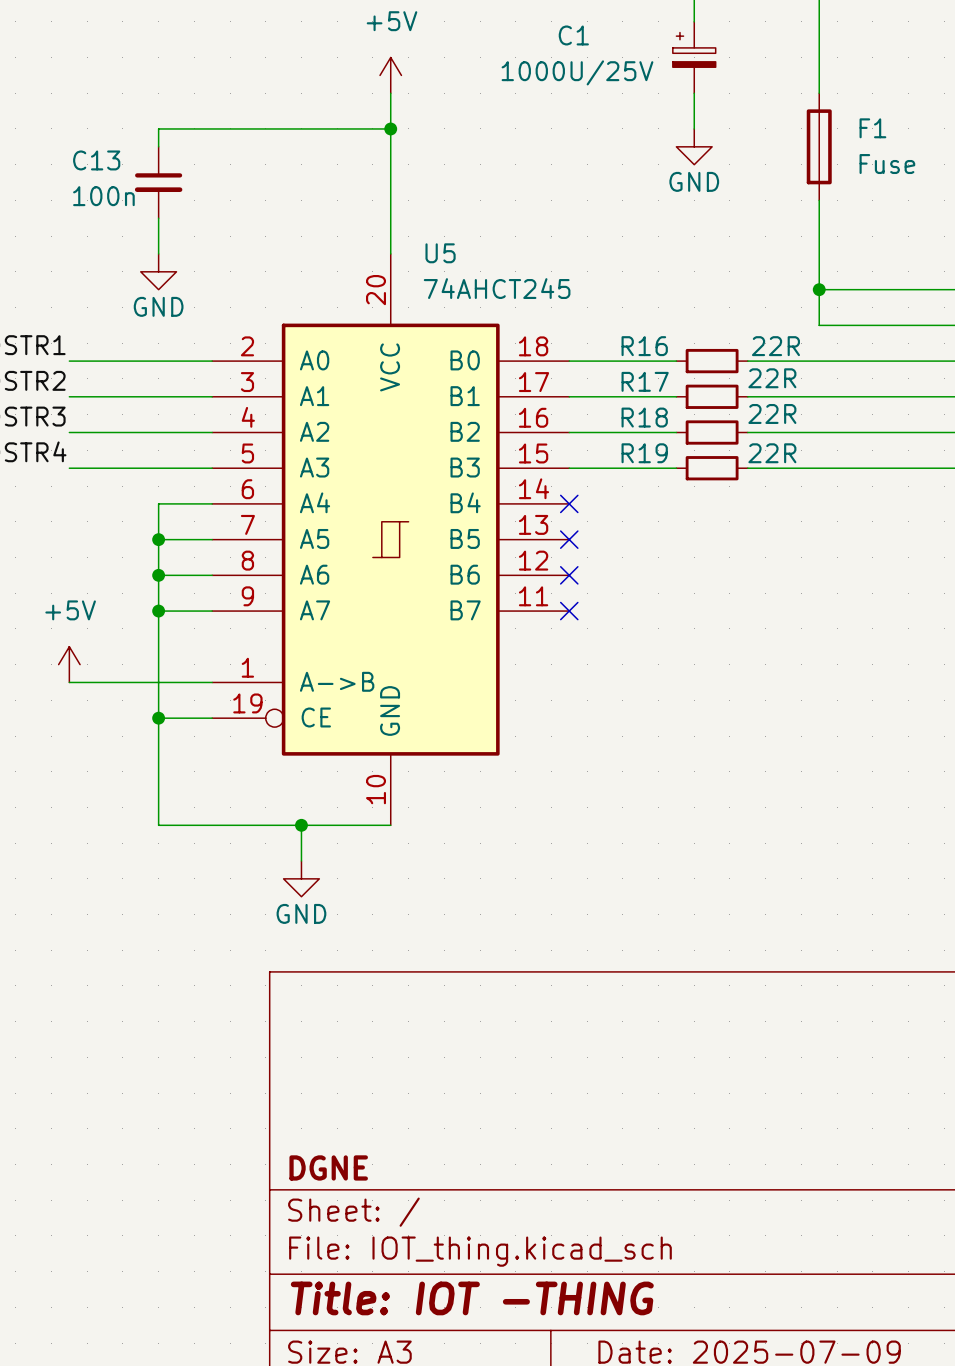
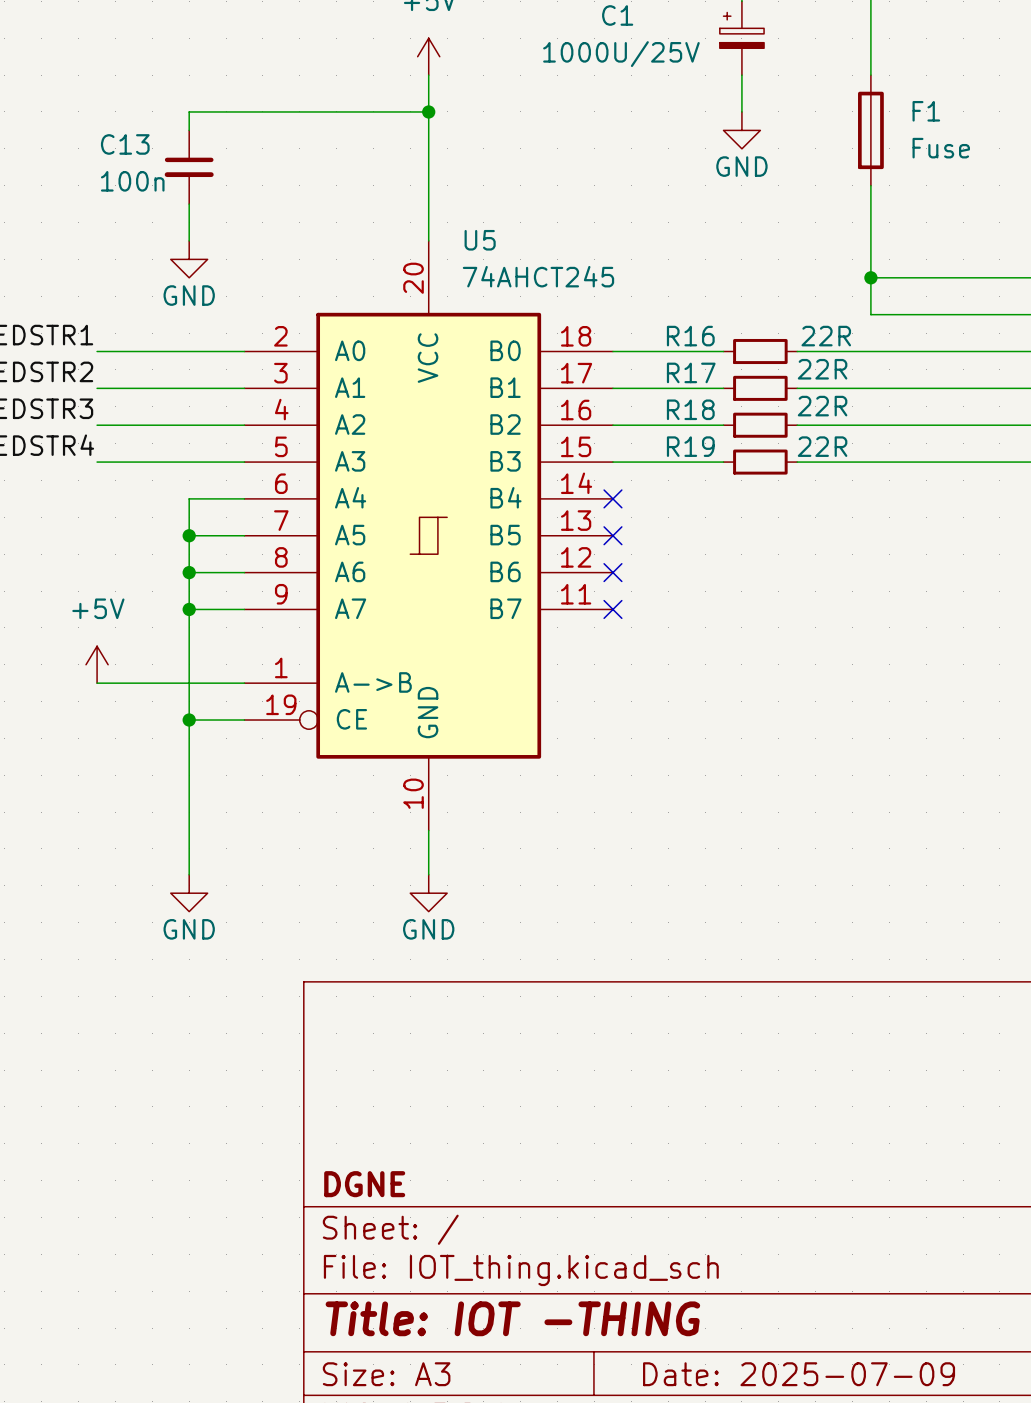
wire: (158, 825) (390, 825) -> (189, 830) (189, 874)
wire: (301, 825) (301, 861) -> none
junction: (301, 825) -> none
wire: none -> (428, 830) (428, 874)
power symbol: GND (301, 878) -> none
power symbol: none -> GND (189, 893)
power symbol: none -> GND (428, 893)

